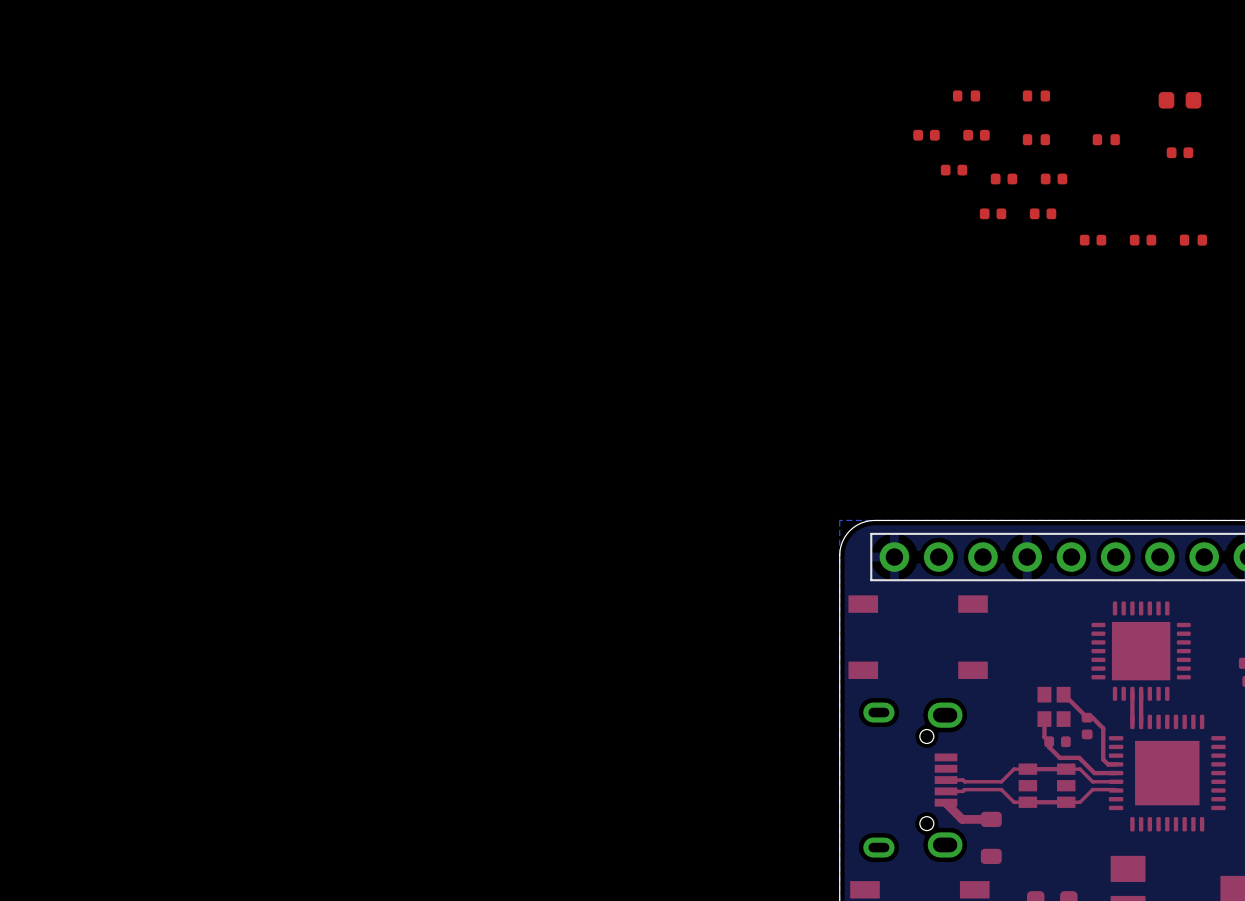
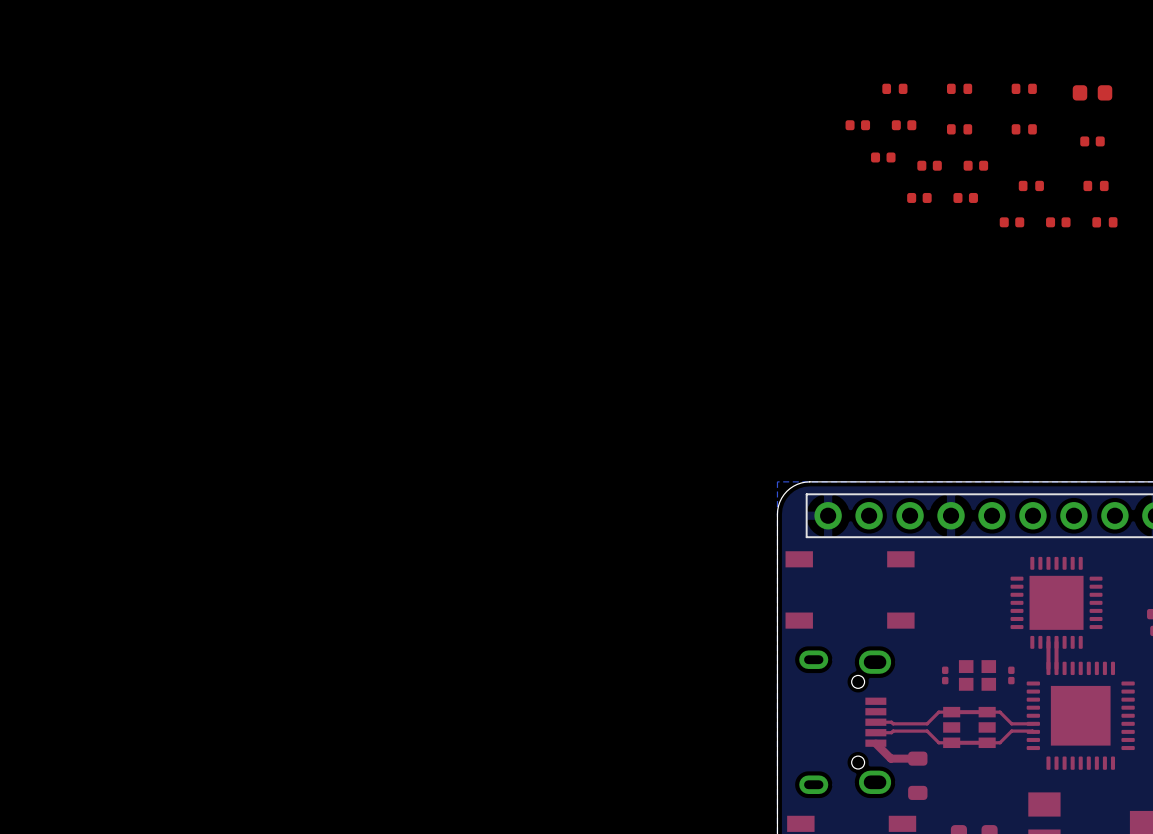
part: none -> (1024, 88)
part: none -> (1031, 185)
part: none -> (1096, 185)
top track: (1063, 694) (1087, 717) (1092, 717) (1103, 728) (1103, 759) (1108, 764) (1116, 764) -> none
part rotation: 0° (1054, 706) -> 90° clockwise (977, 675)
part footprint: [1081, 712, 1093, 740] -> [1008, 666, 1015, 685]
top track: (1044, 719) (1044, 737) (1049, 741) (1049, 747) (1059, 757) (1079, 757) (1094, 773) (1116, 773) -> none
part: none -> (945, 675)
part: (1057, 741) -> none

